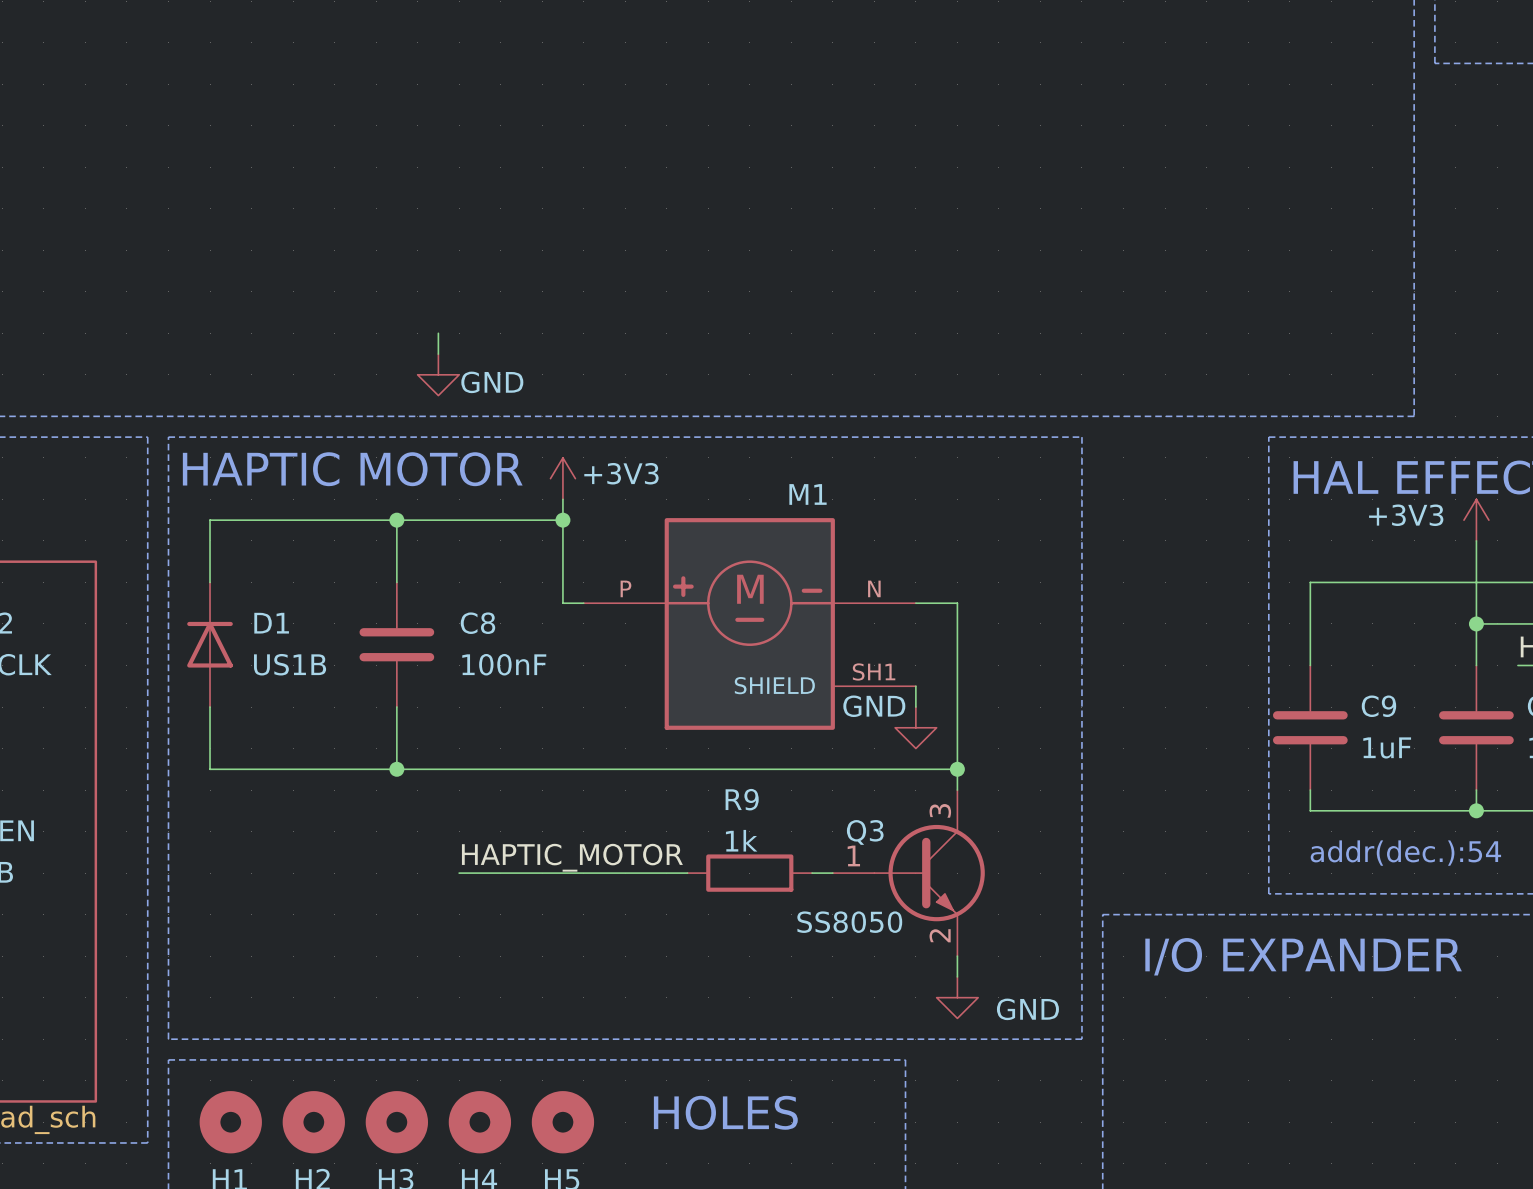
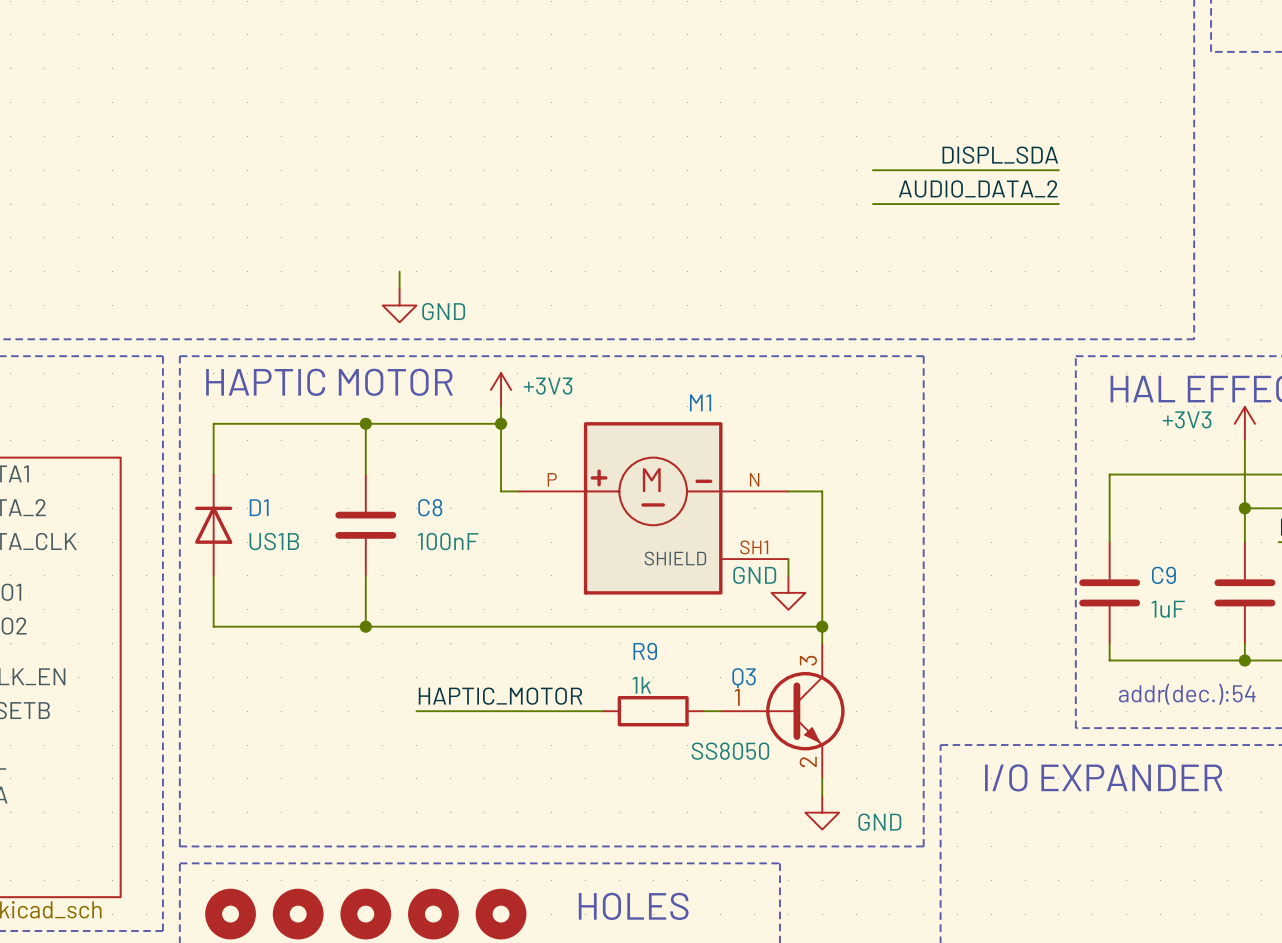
label: none -> DISPL_SDA (1000, 155)
wire: none -> (872, 170) (1058, 170)
label: none -> AUDIO_DATA_2 (978, 188)
wire: none -> (872, 204) (1058, 204)

